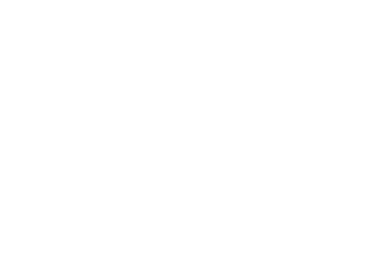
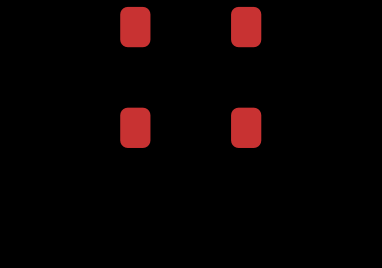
part: none -> (190, 27)
part: none -> (190, 127)

